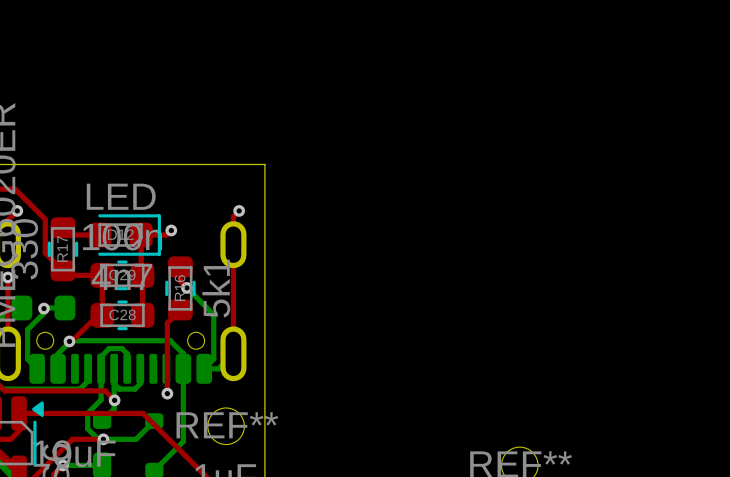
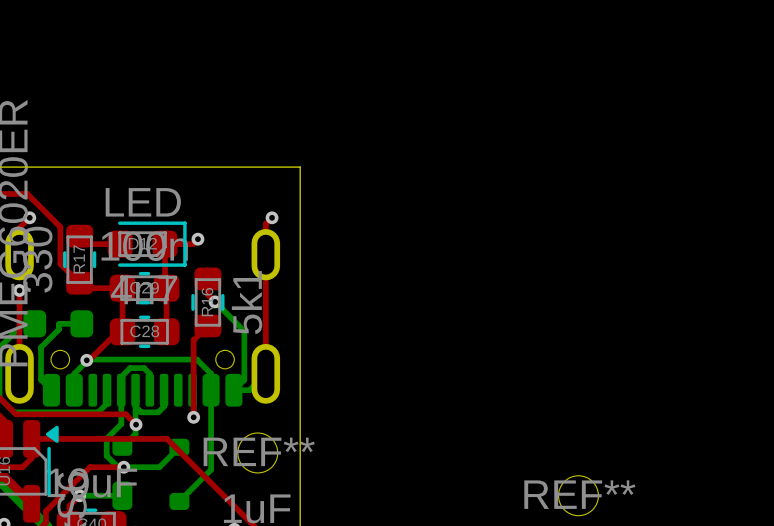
via: (43, 308) -> none

